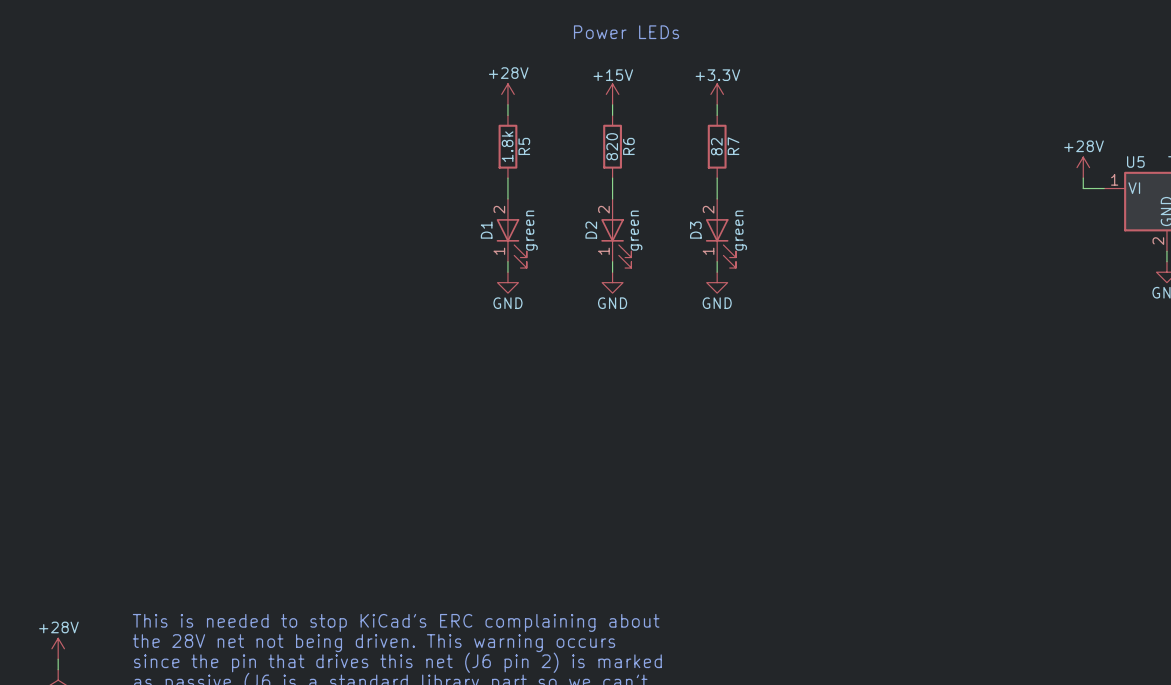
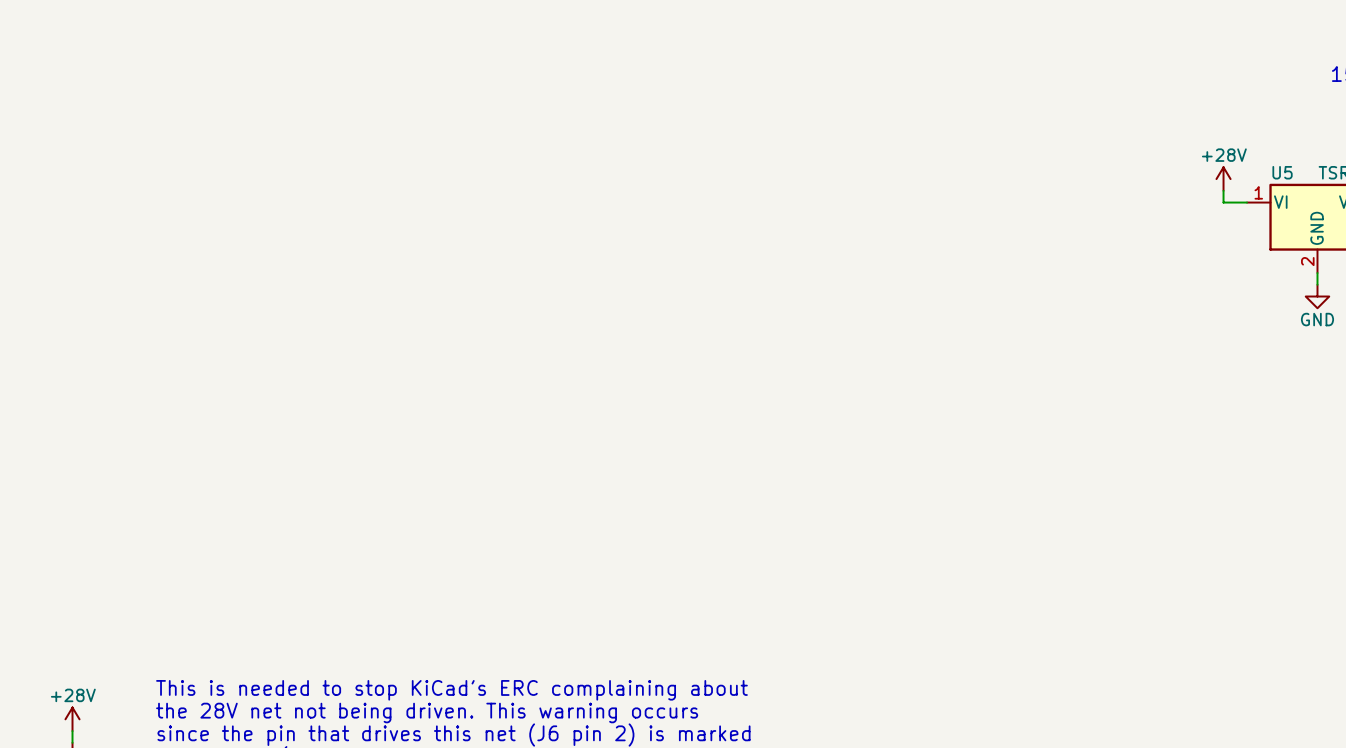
text: Power LEDs (626, 32) -> none
power symbol: +28V (507, 94) -> none
power symbol: +15V (612, 94) -> none
power symbol: +3.3V (717, 94) -> none
wire: (507, 104) (507, 115) -> none
wire: (612, 104) (612, 115) -> none
wire: (717, 104) (717, 115) -> none
R5: 1.8k (507, 146) -> none
R6: 820 (612, 146) -> none
R7: 82 (717, 146) -> none
wire: (507, 178) (507, 198) -> none
wire: (612, 178) (612, 198) -> none
wire: (717, 178) (717, 198) -> none
D1: green (511, 233) -> none
D2: green (616, 233) -> none
D3: green (720, 233) -> none
wire: (507, 261) (507, 272) -> none
wire: (612, 261) (612, 272) -> none
wire: (717, 261) (717, 272) -> none
power symbol: GND (507, 282) -> none
power symbol: GND (612, 282) -> none
power symbol: GND (717, 282) -> none

